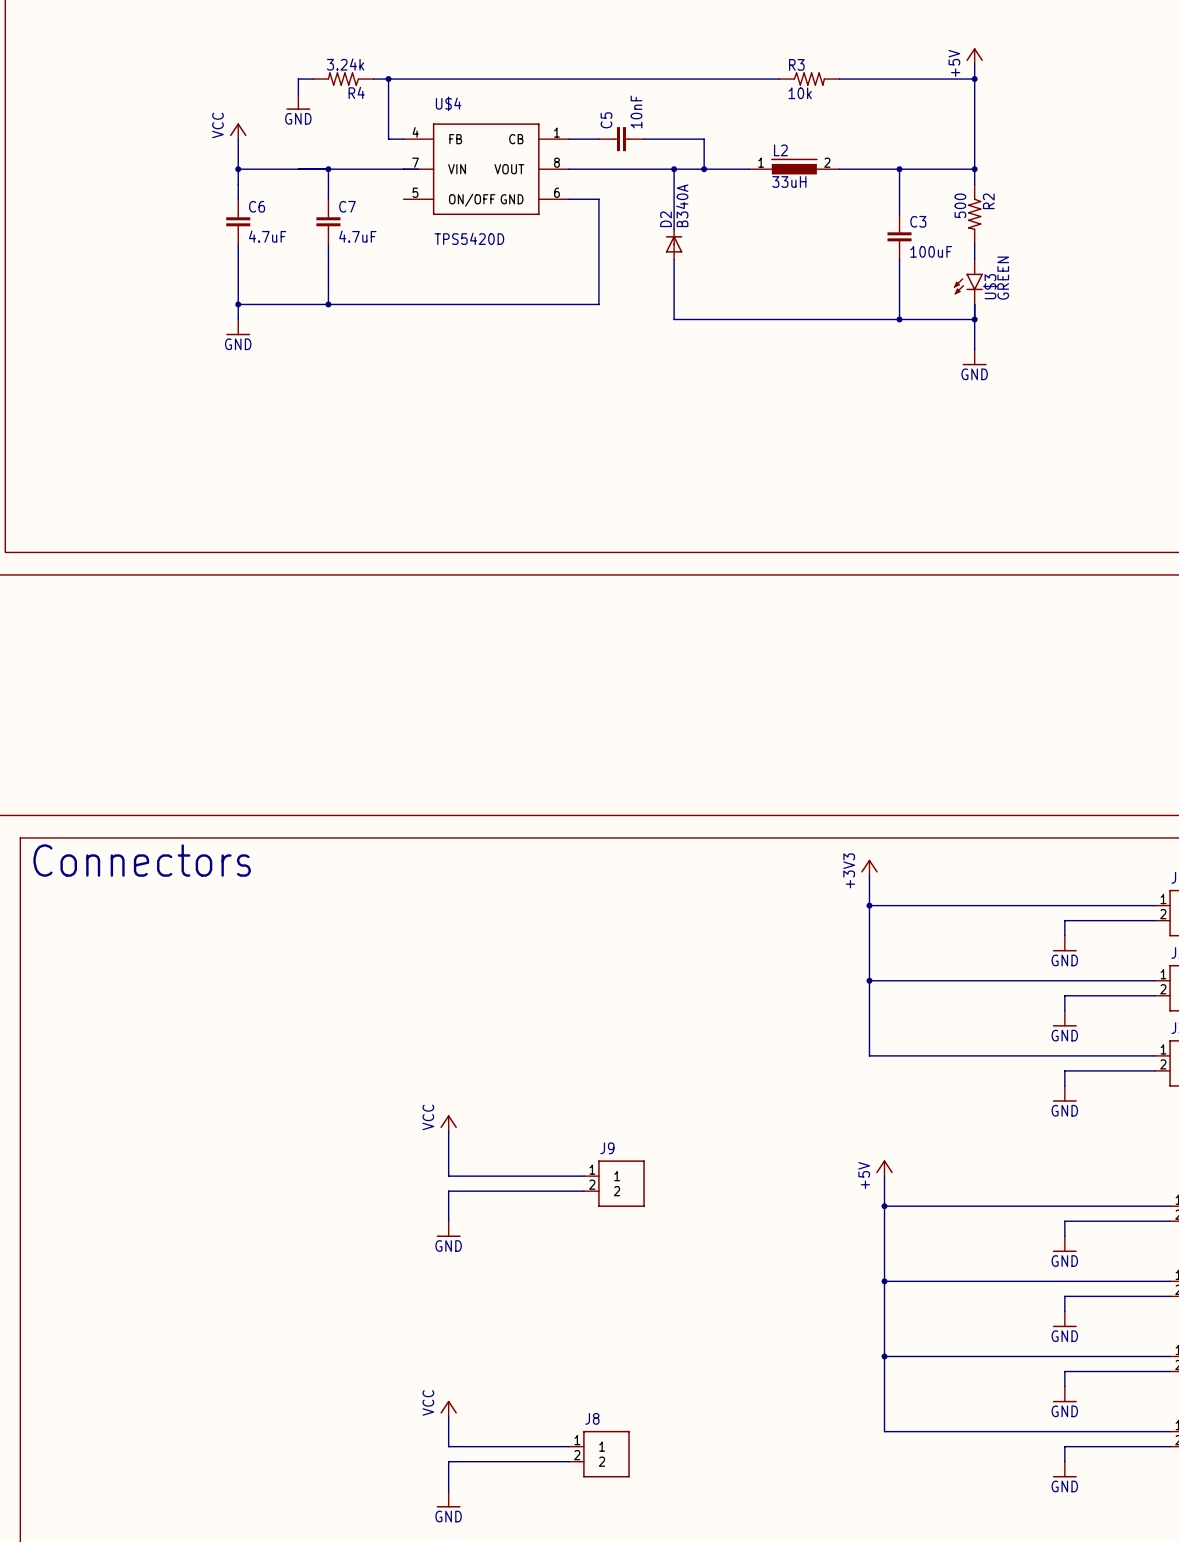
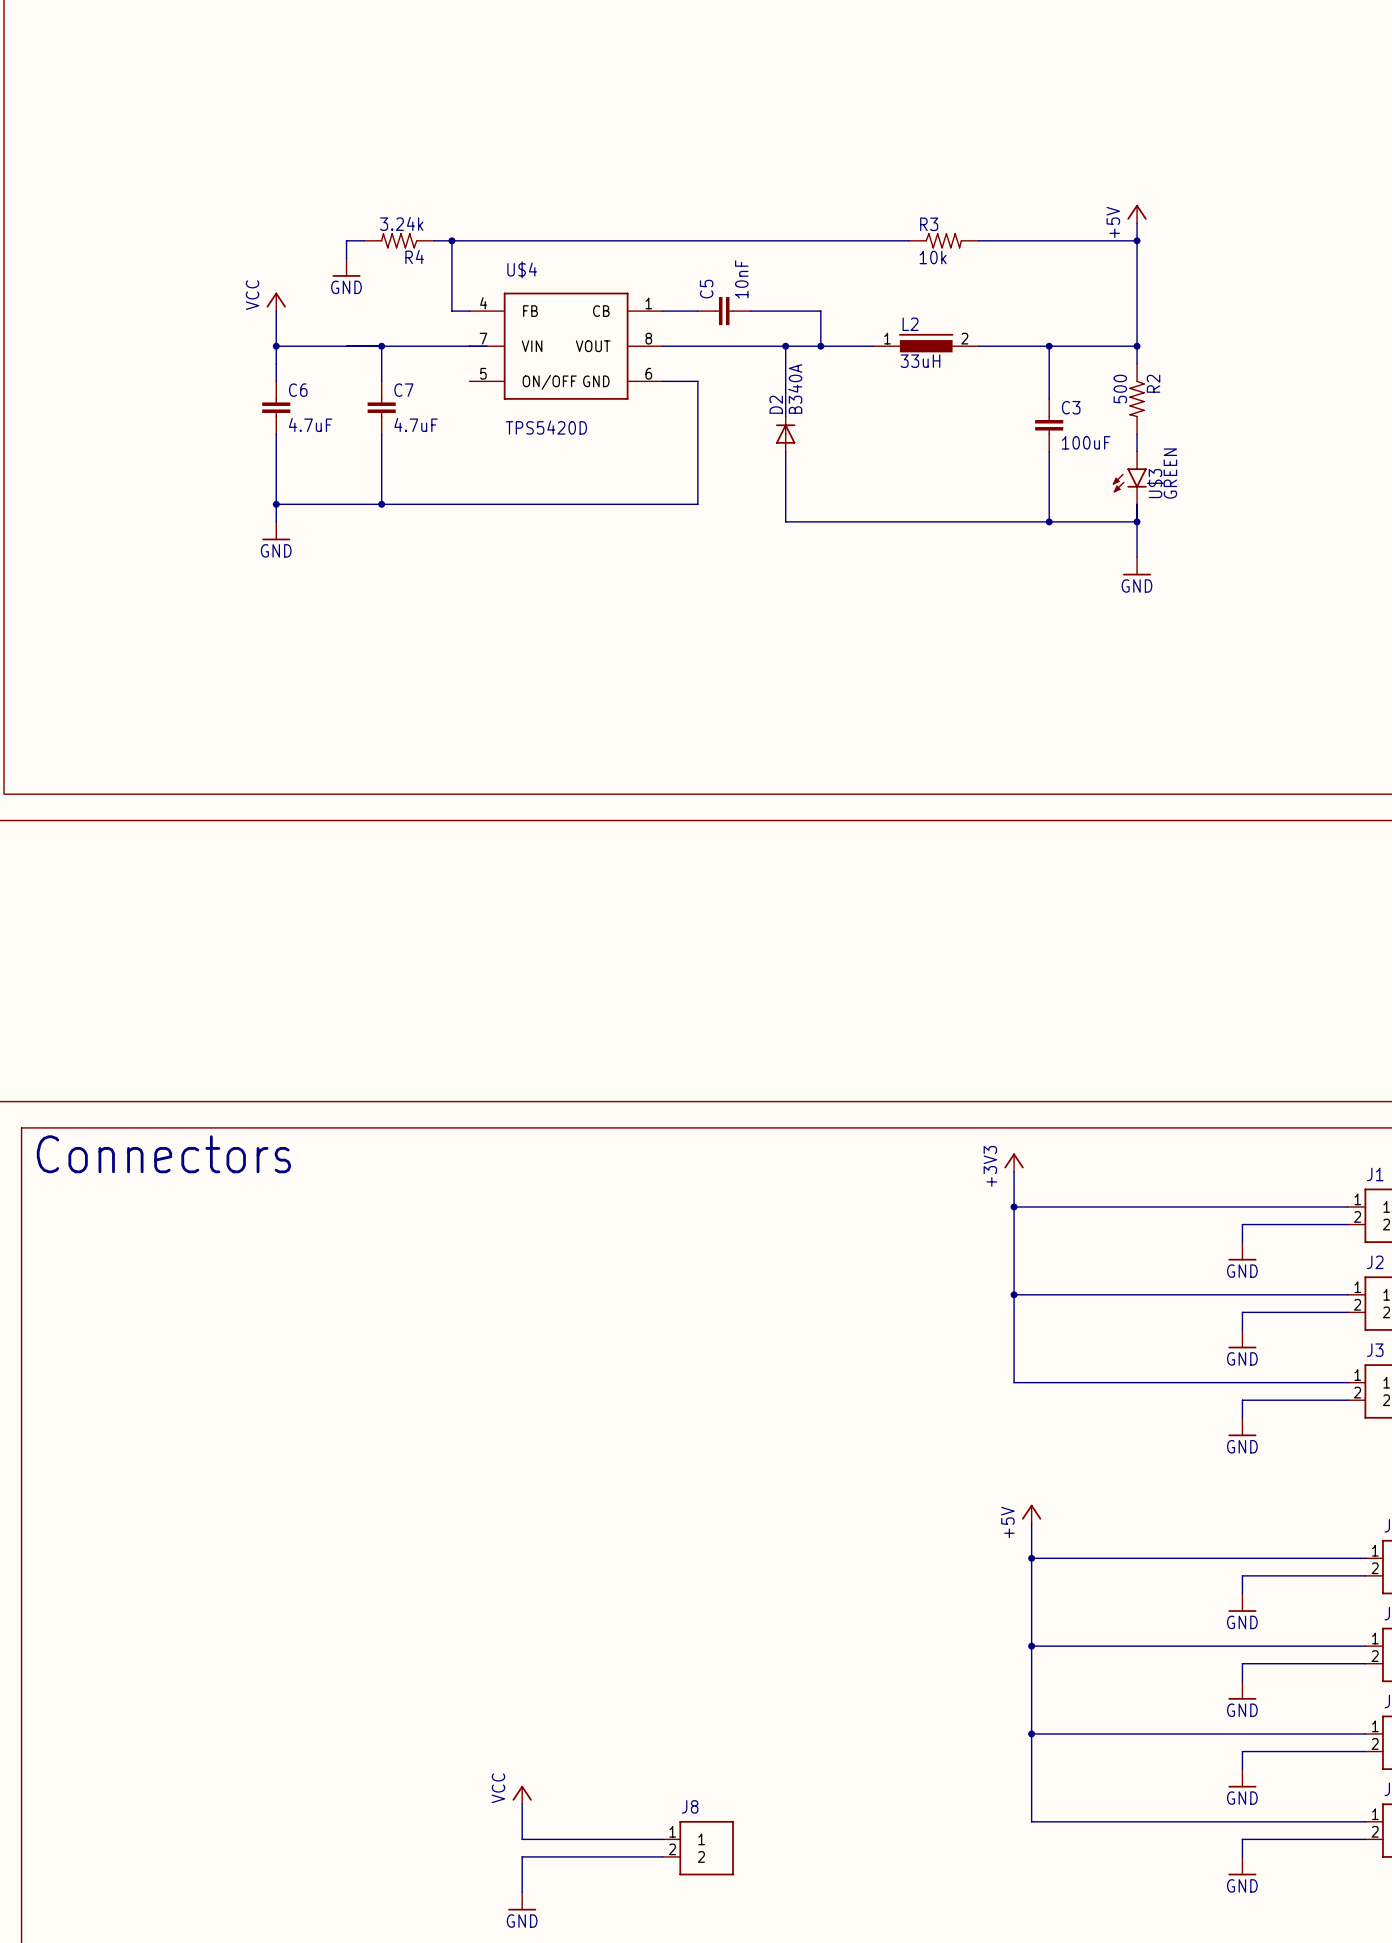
power symbol: VCC (448, 1123) -> none
wire: (448, 1131) (448, 1176) (583, 1176) -> none
J9: (614, 1183) -> none
wire: (583, 1191) (448, 1191) (448, 1221) -> none
power symbol: GND (448, 1229) -> none

